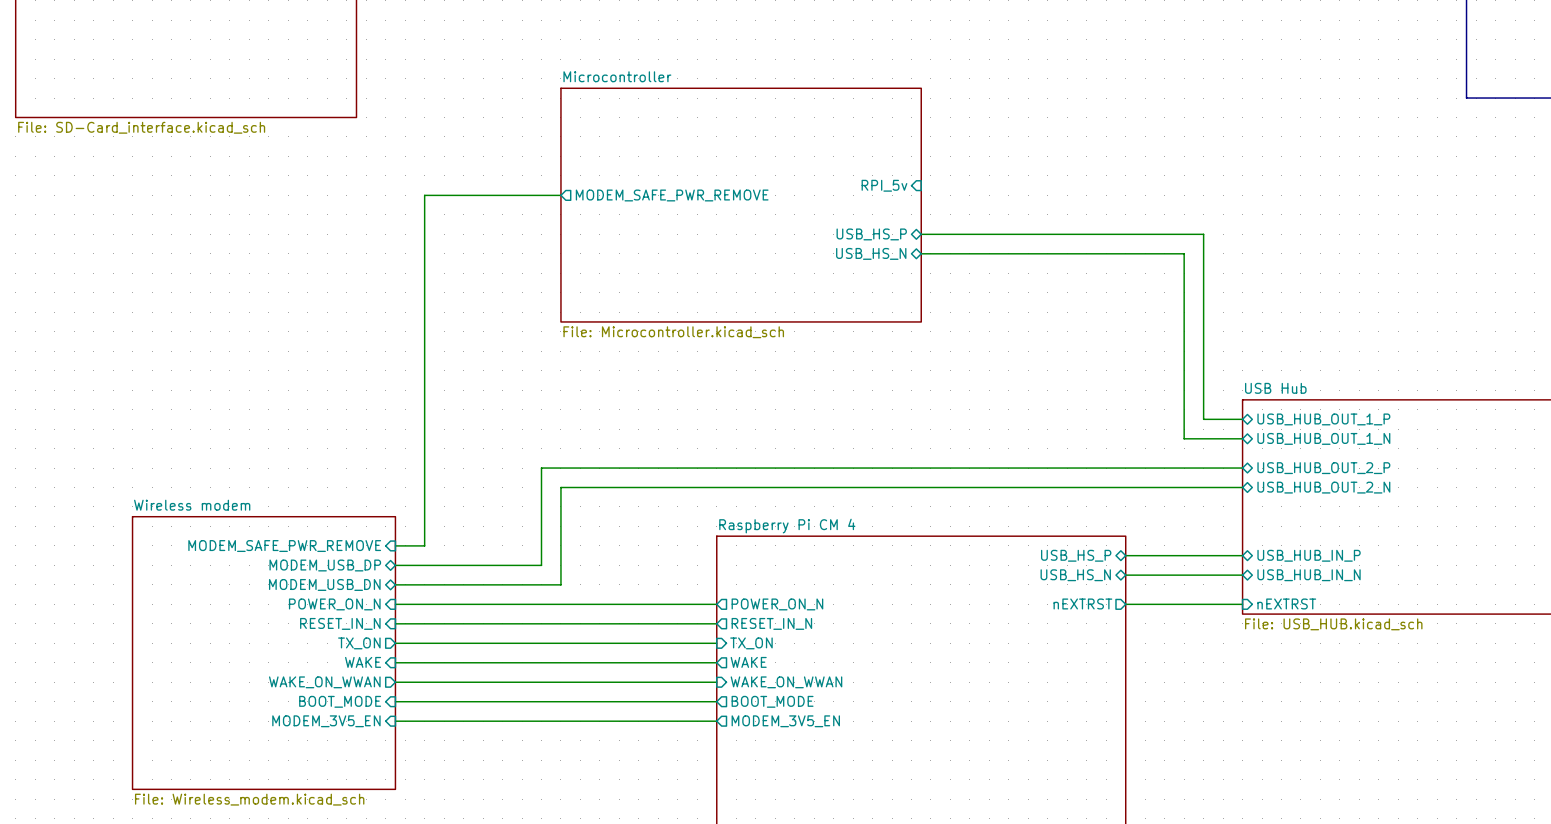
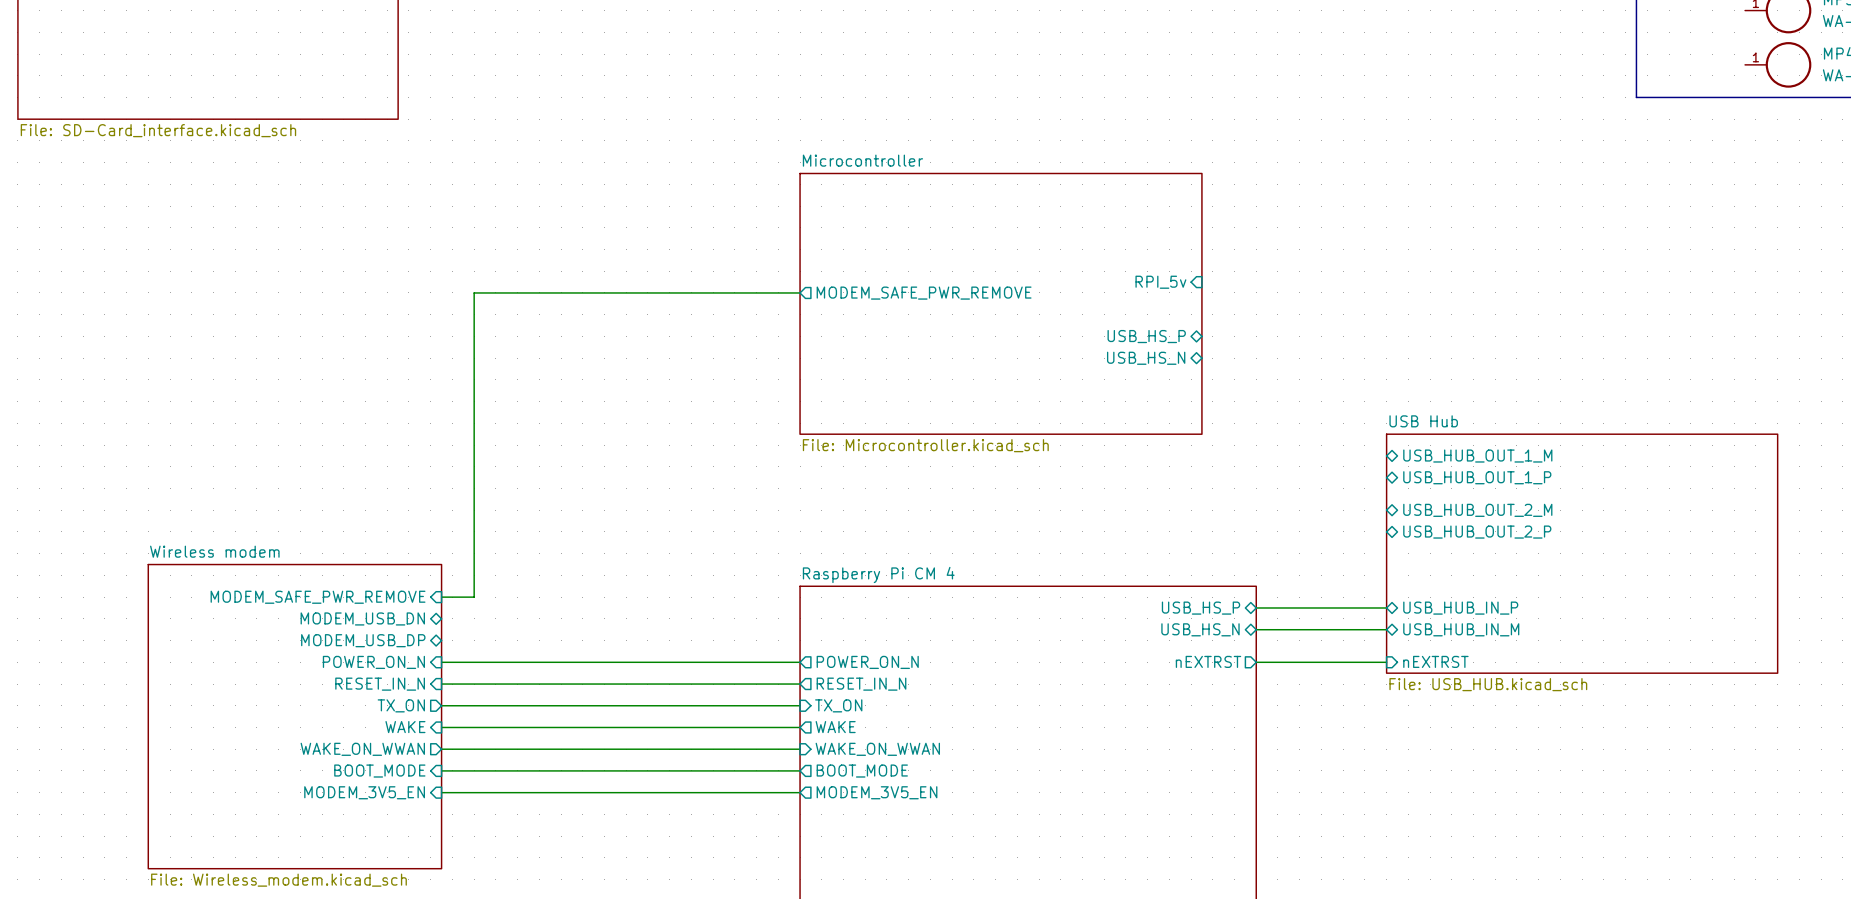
sheet pin position: RPI_5v (884, 185) -> RPI_5v (1160, 282)
wire: (560, 195) (424, 195) (424, 273) -> (800, 292) (474, 292)
sheet pin position: MODEM_SAFE_PWR_REMOVE (672, 195) -> MODEM_SAFE_PWR_REMOVE (924, 293)
sheet Microcontroller position: (741, 205) -> (1000, 303)
sheet pin position: USB_HS_P (871, 234) -> USB_HS_P (1146, 336)
wire: (921, 234) (1203, 234) (1203, 419) (1242, 419) -> none
sheet pin position: USB_HS_N (871, 253) -> USB_HS_N (1146, 358)
wire: (921, 253) (1184, 253) (1184, 438) (1242, 438) -> none
sheet pin: USB_HUB_OUT_1_P (1323, 419) -> USB_HUB_OUT_1_M (1477, 456)
sheet pin: USB_HUB_OUT_1_N (1323, 438) -> USB_HUB_OUT_1_P (1477, 477)
wire: (1242, 468) (541, 468) (541, 565) (395, 565) -> none
sheet pin: USB_HUB_OUT_2_P (1323, 468) -> USB_HUB_OUT_2_M (1477, 510)
wire: (1242, 487) (560, 487) (560, 584) (395, 584) -> none
sheet pin: USB_HUB_OUT_2_N (1323, 487) -> USB_HUB_OUT_2_P (1477, 532)
sheet pin: MODEM_USB_DP (325, 565) -> MODEM_USB_DN (362, 618)
sheet pin: USB_HUB_IN_N (1309, 575) -> USB_HUB_IN_M (1461, 629)
sheet pin: MODEM_USB_DN (324, 584) -> MODEM_USB_DP (363, 640)

